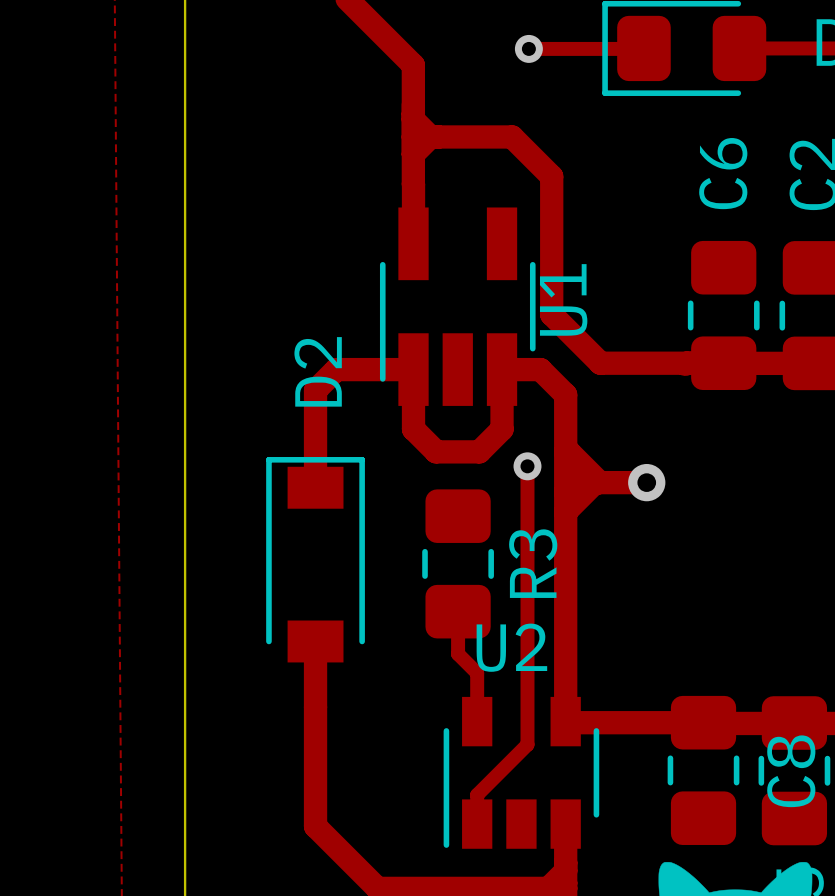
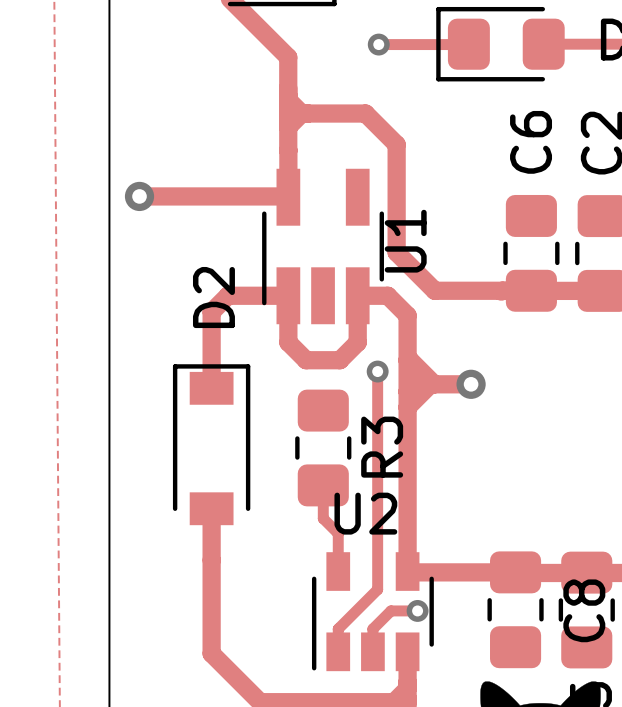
track: none -> (139, 196) (288, 197)
via: none -> (139, 196)
track: none -> (417, 610) (390, 610) (372, 629) (372, 651)
via: none -> (417, 610)

